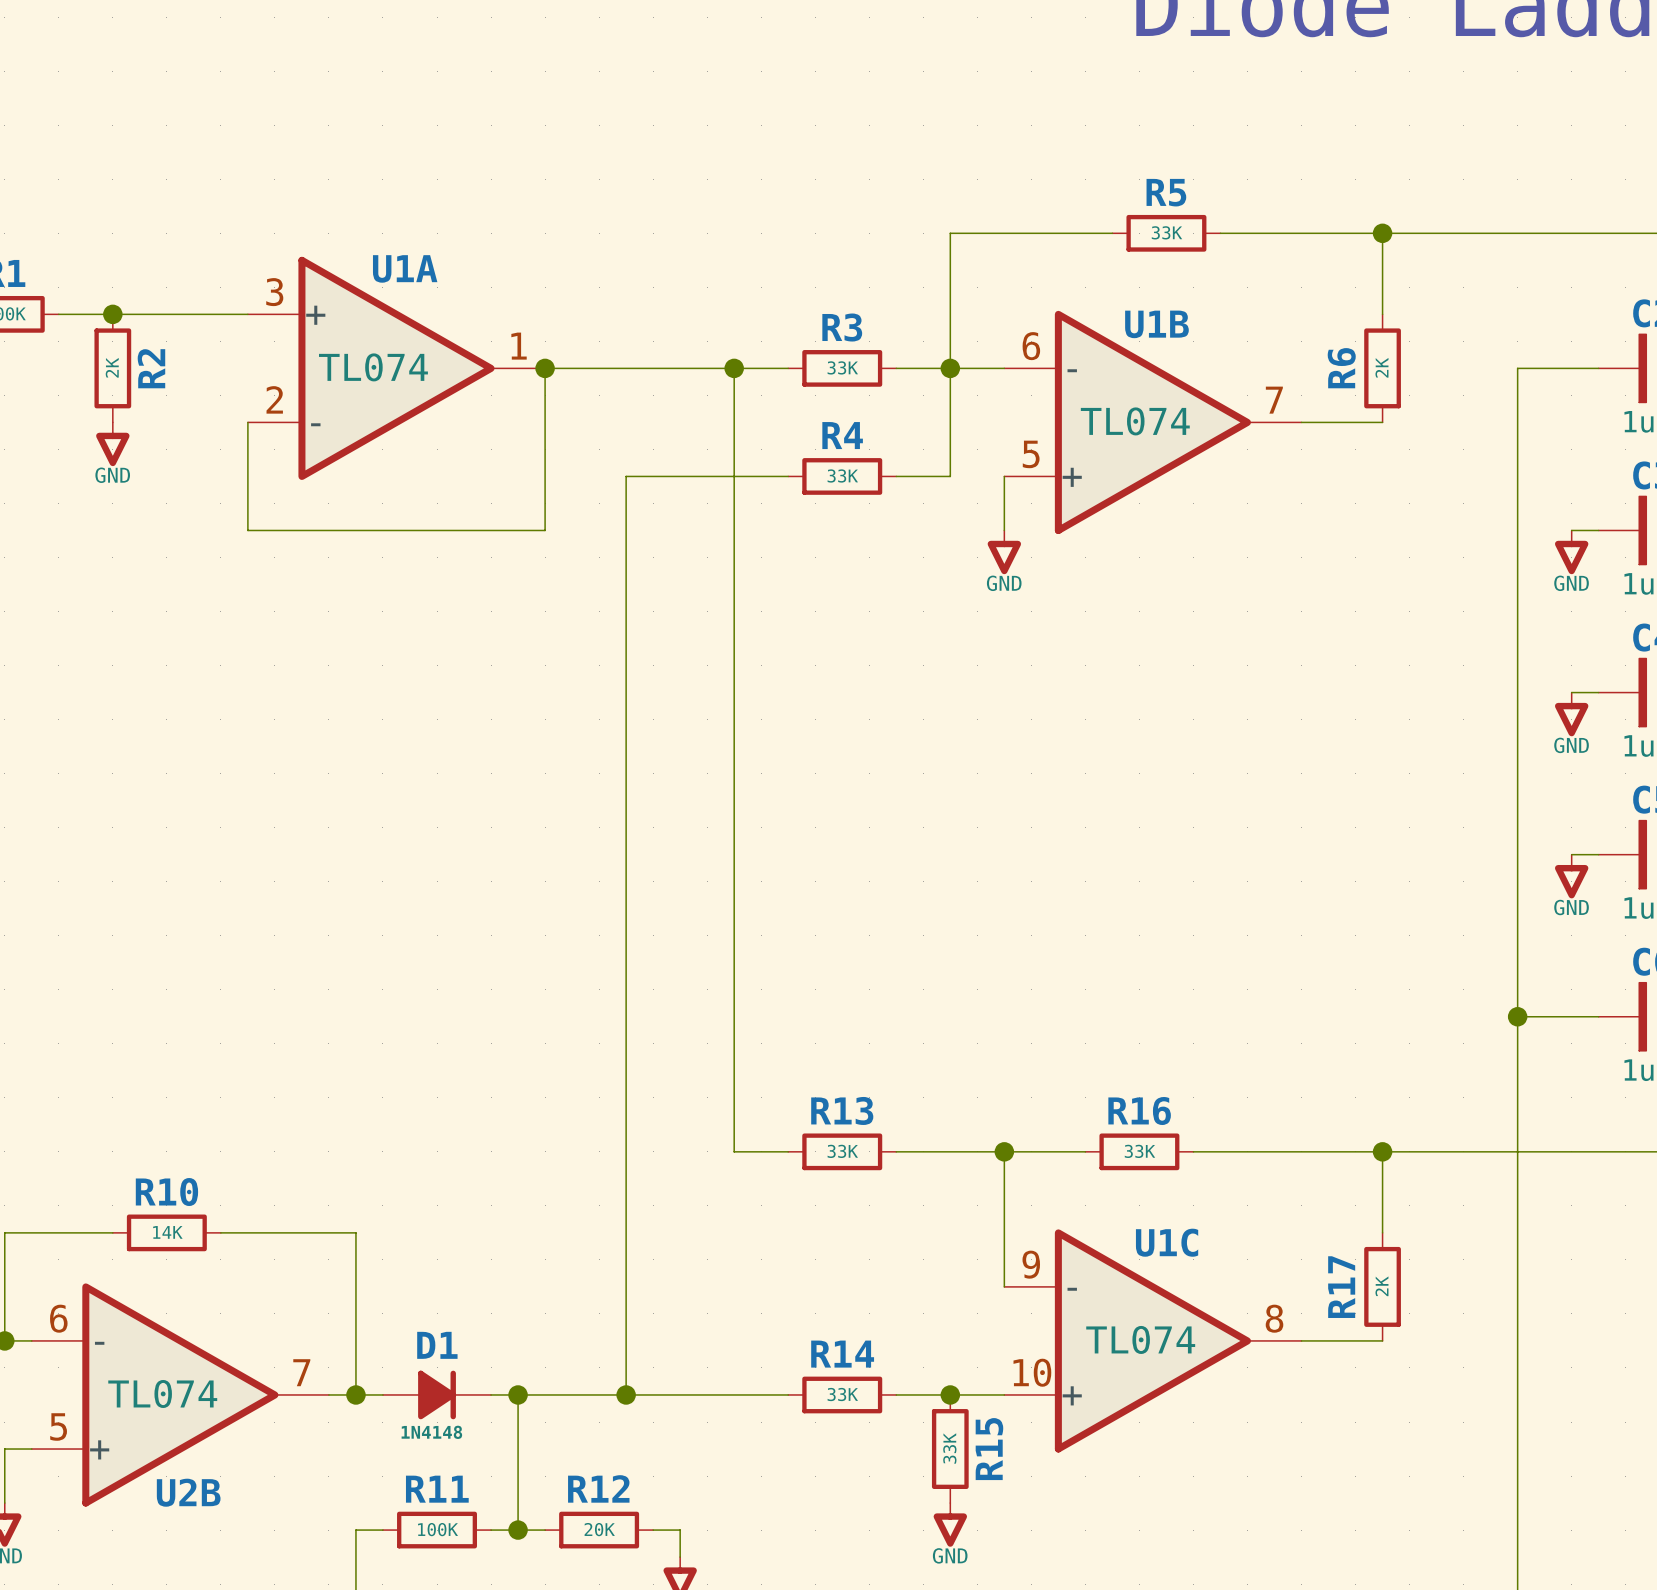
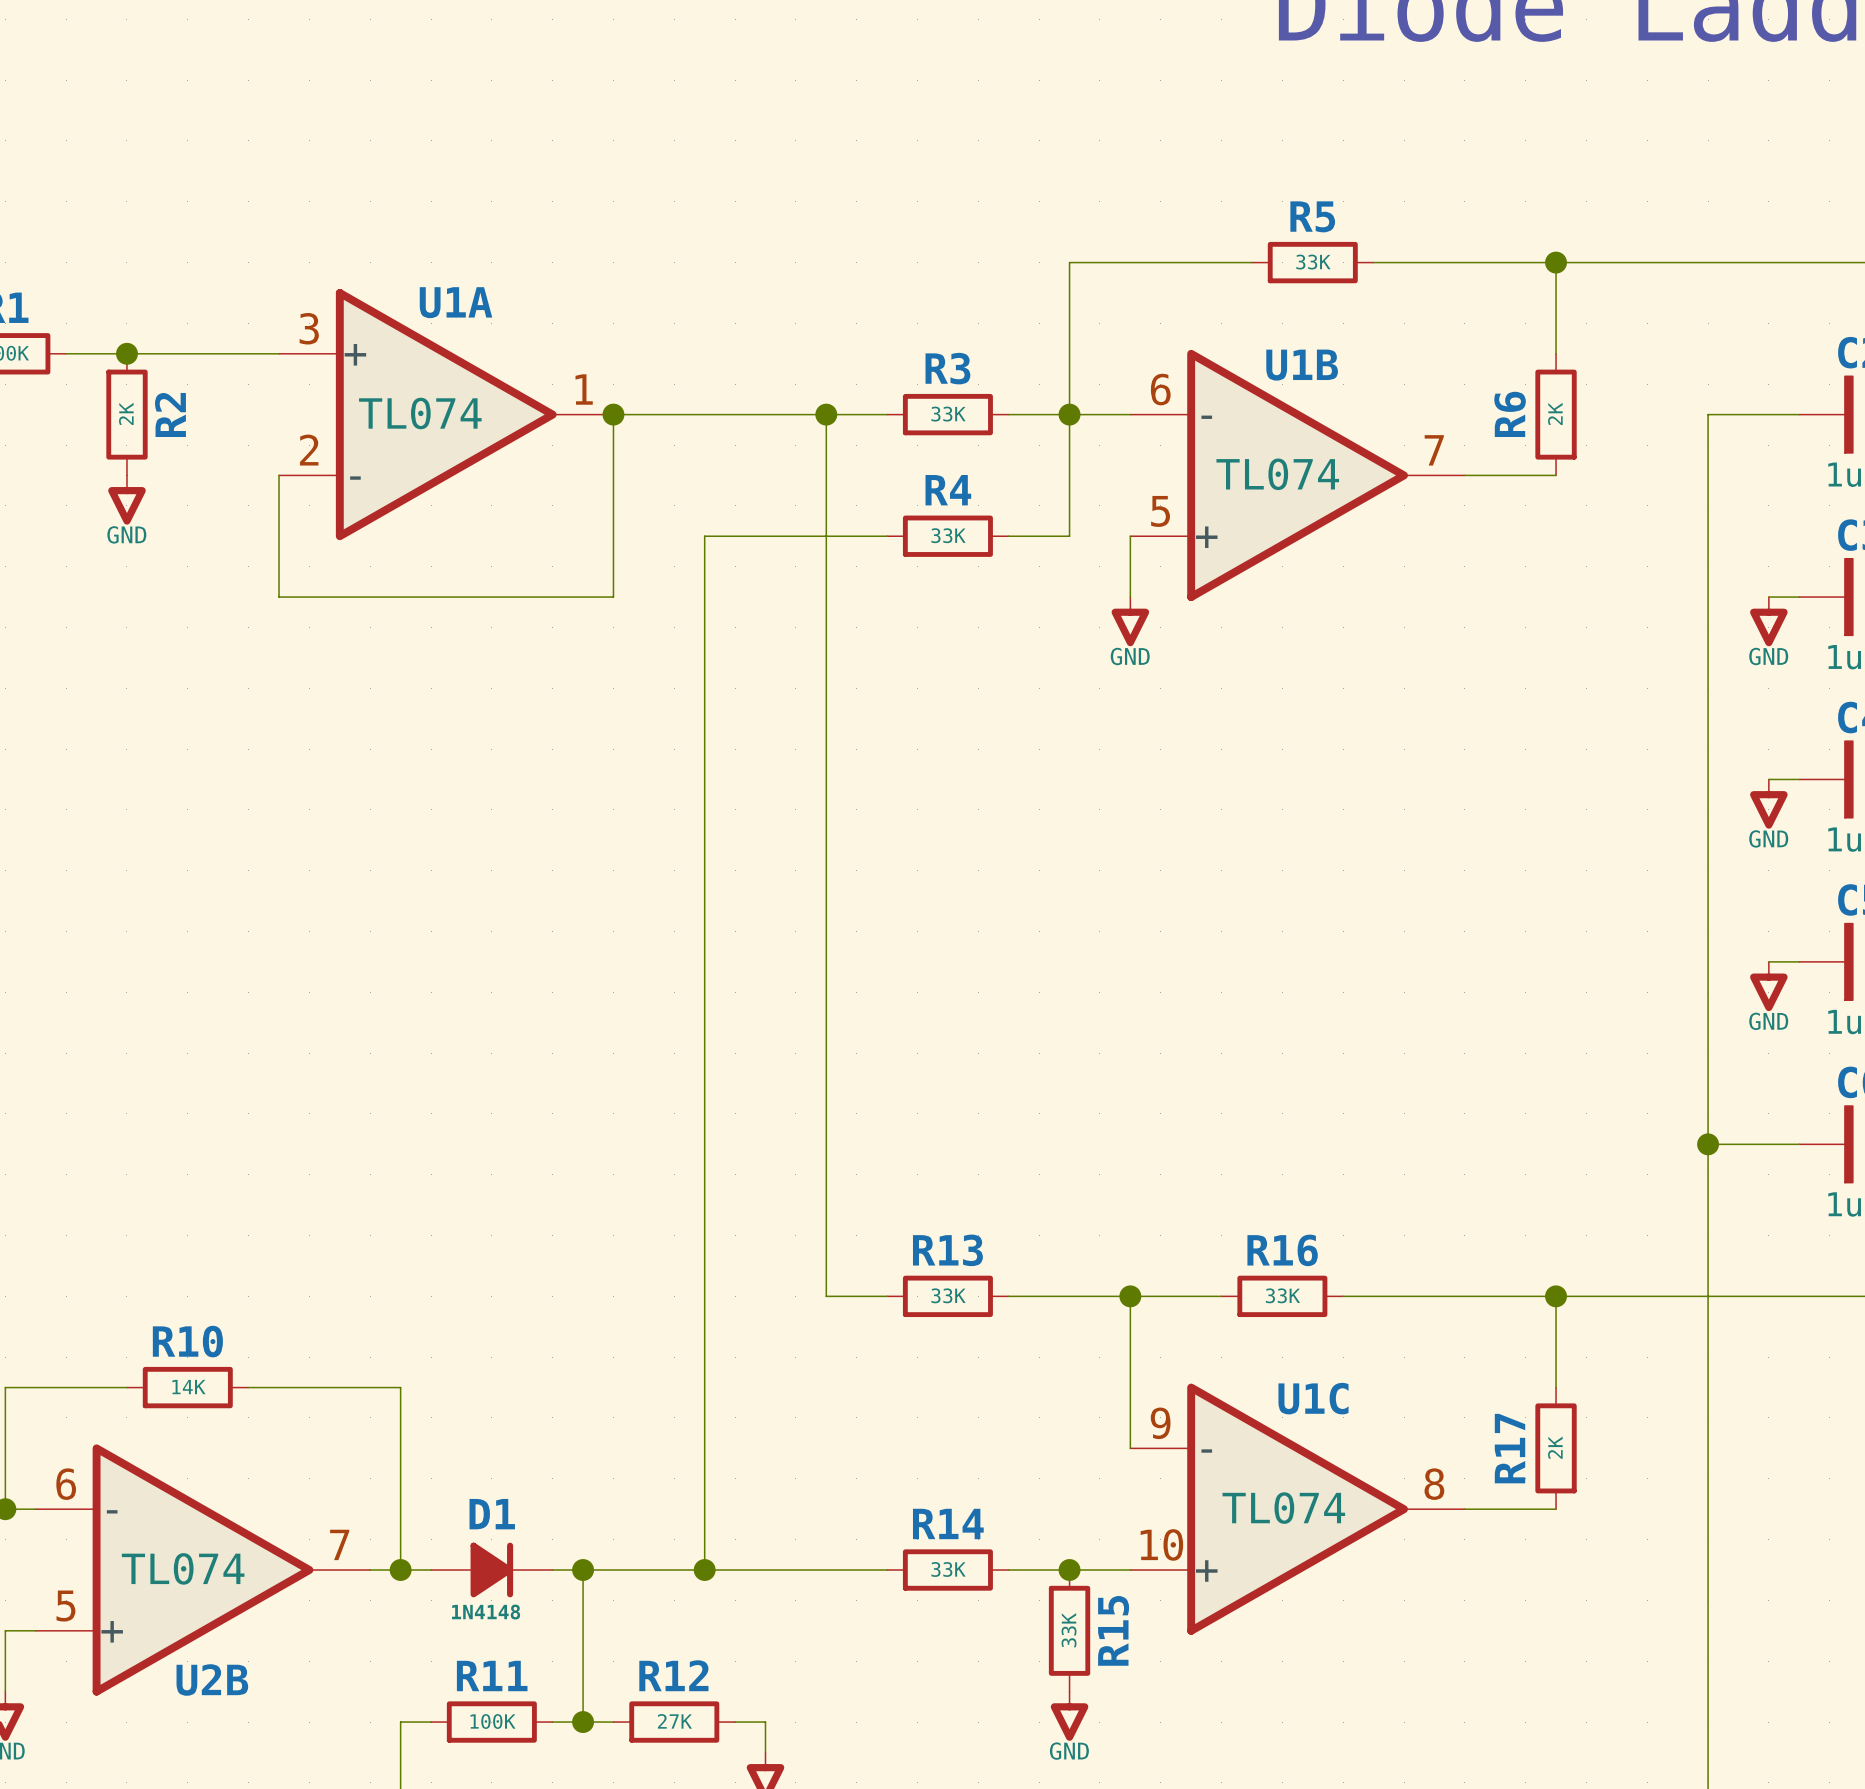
R12 value: 20K (599, 1529) -> 27K (674, 1721)

